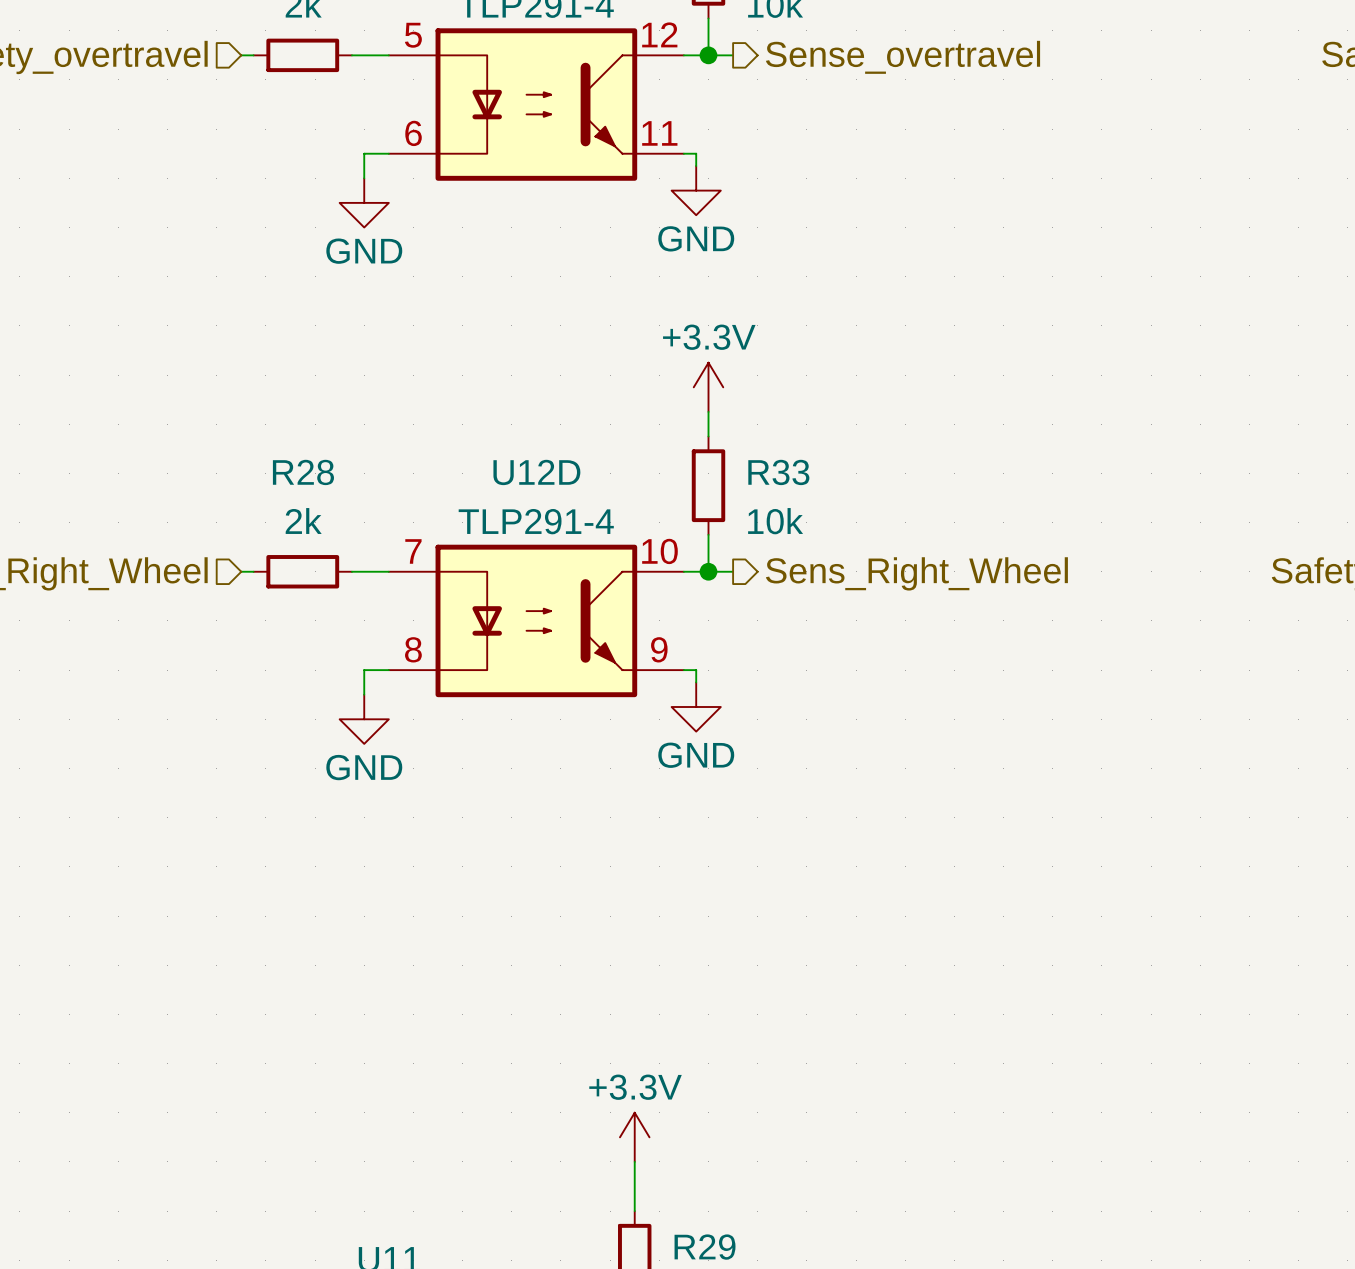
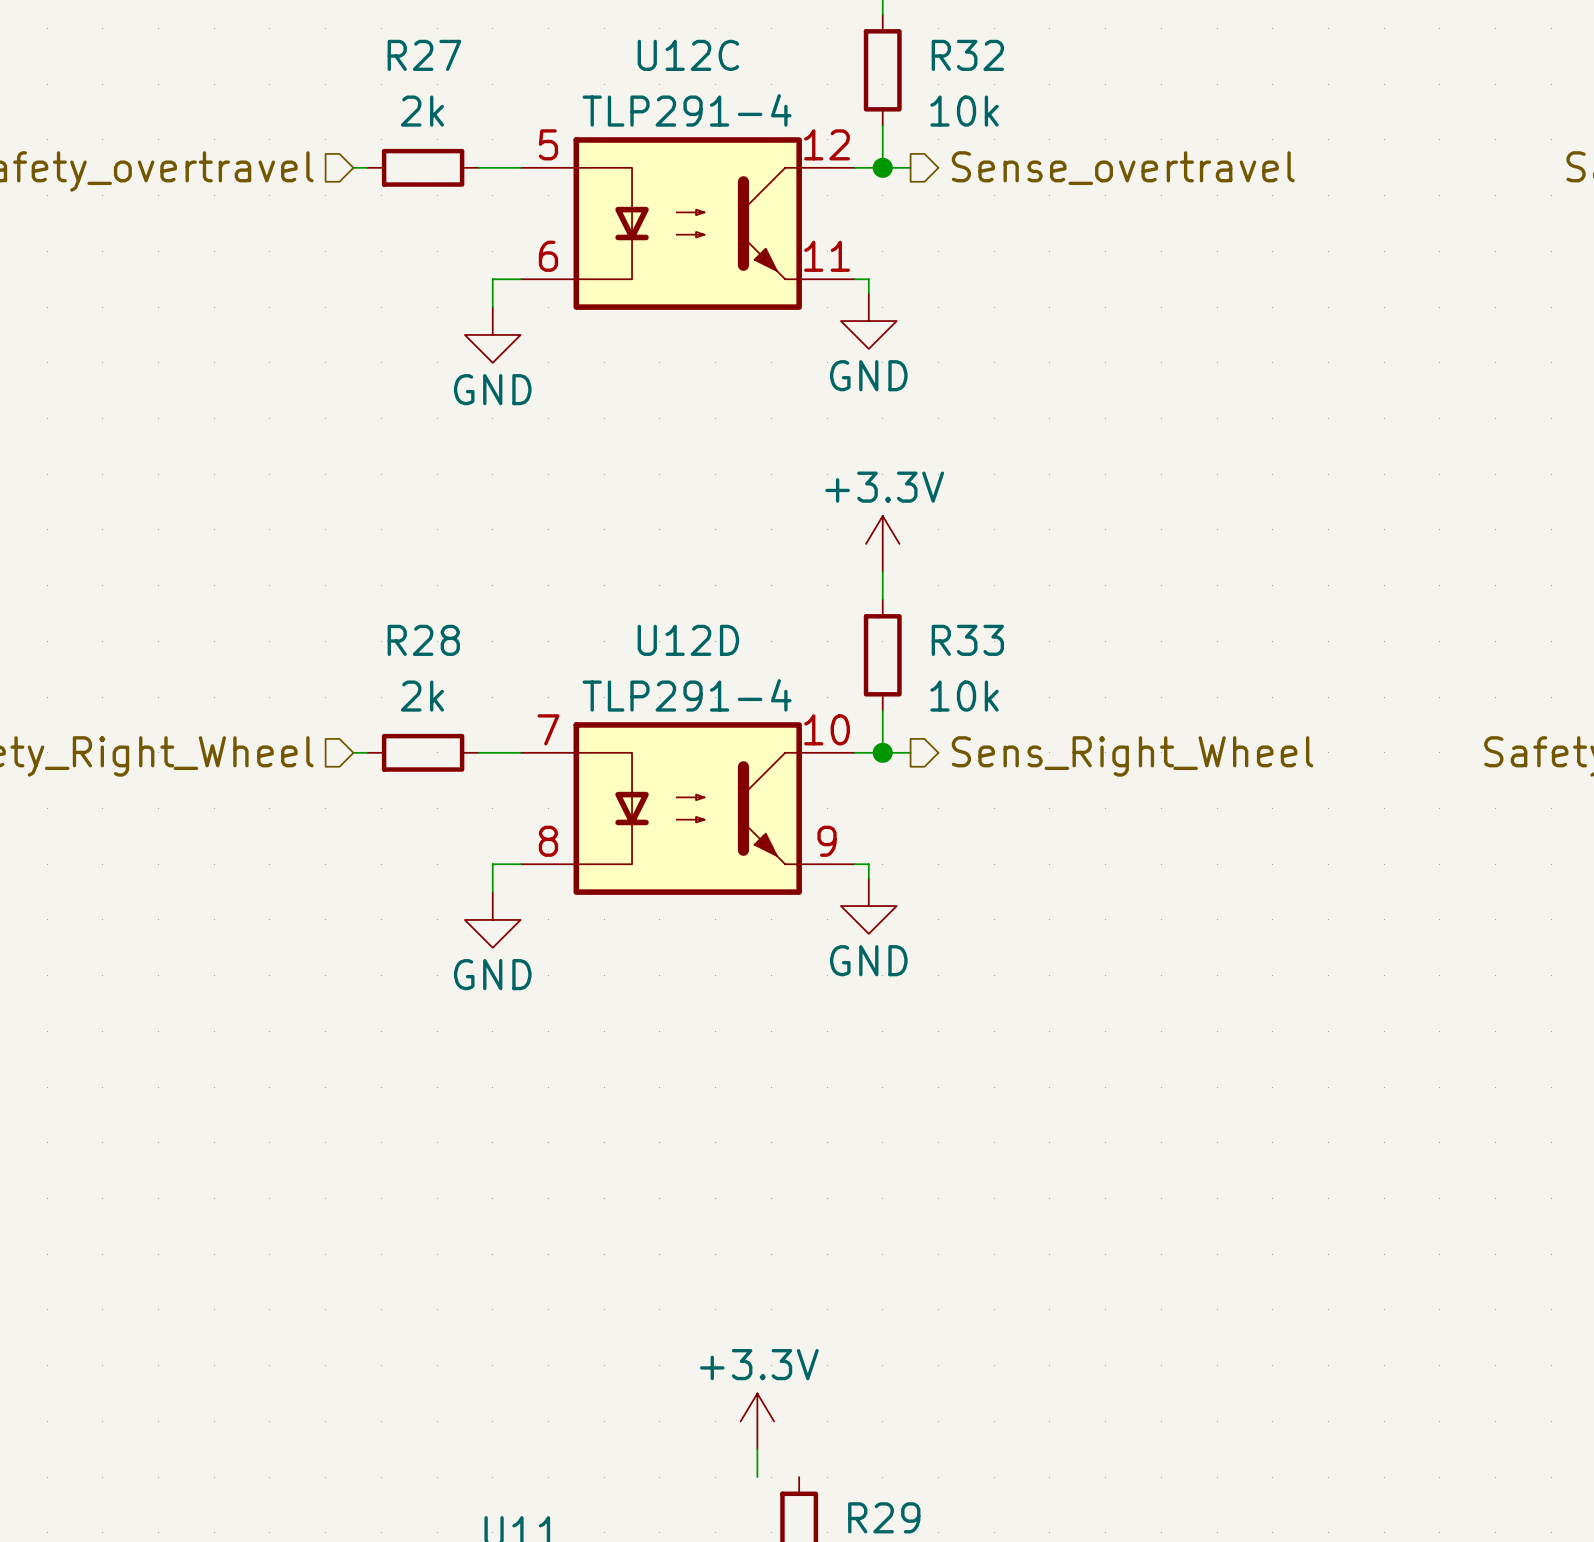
power symbol position: +3.3V (634, 1137) -> +3.3V (757, 1421)
wire: (634, 1161) (634, 1211) -> none
wire: none -> (757, 1449) (757, 1477)

